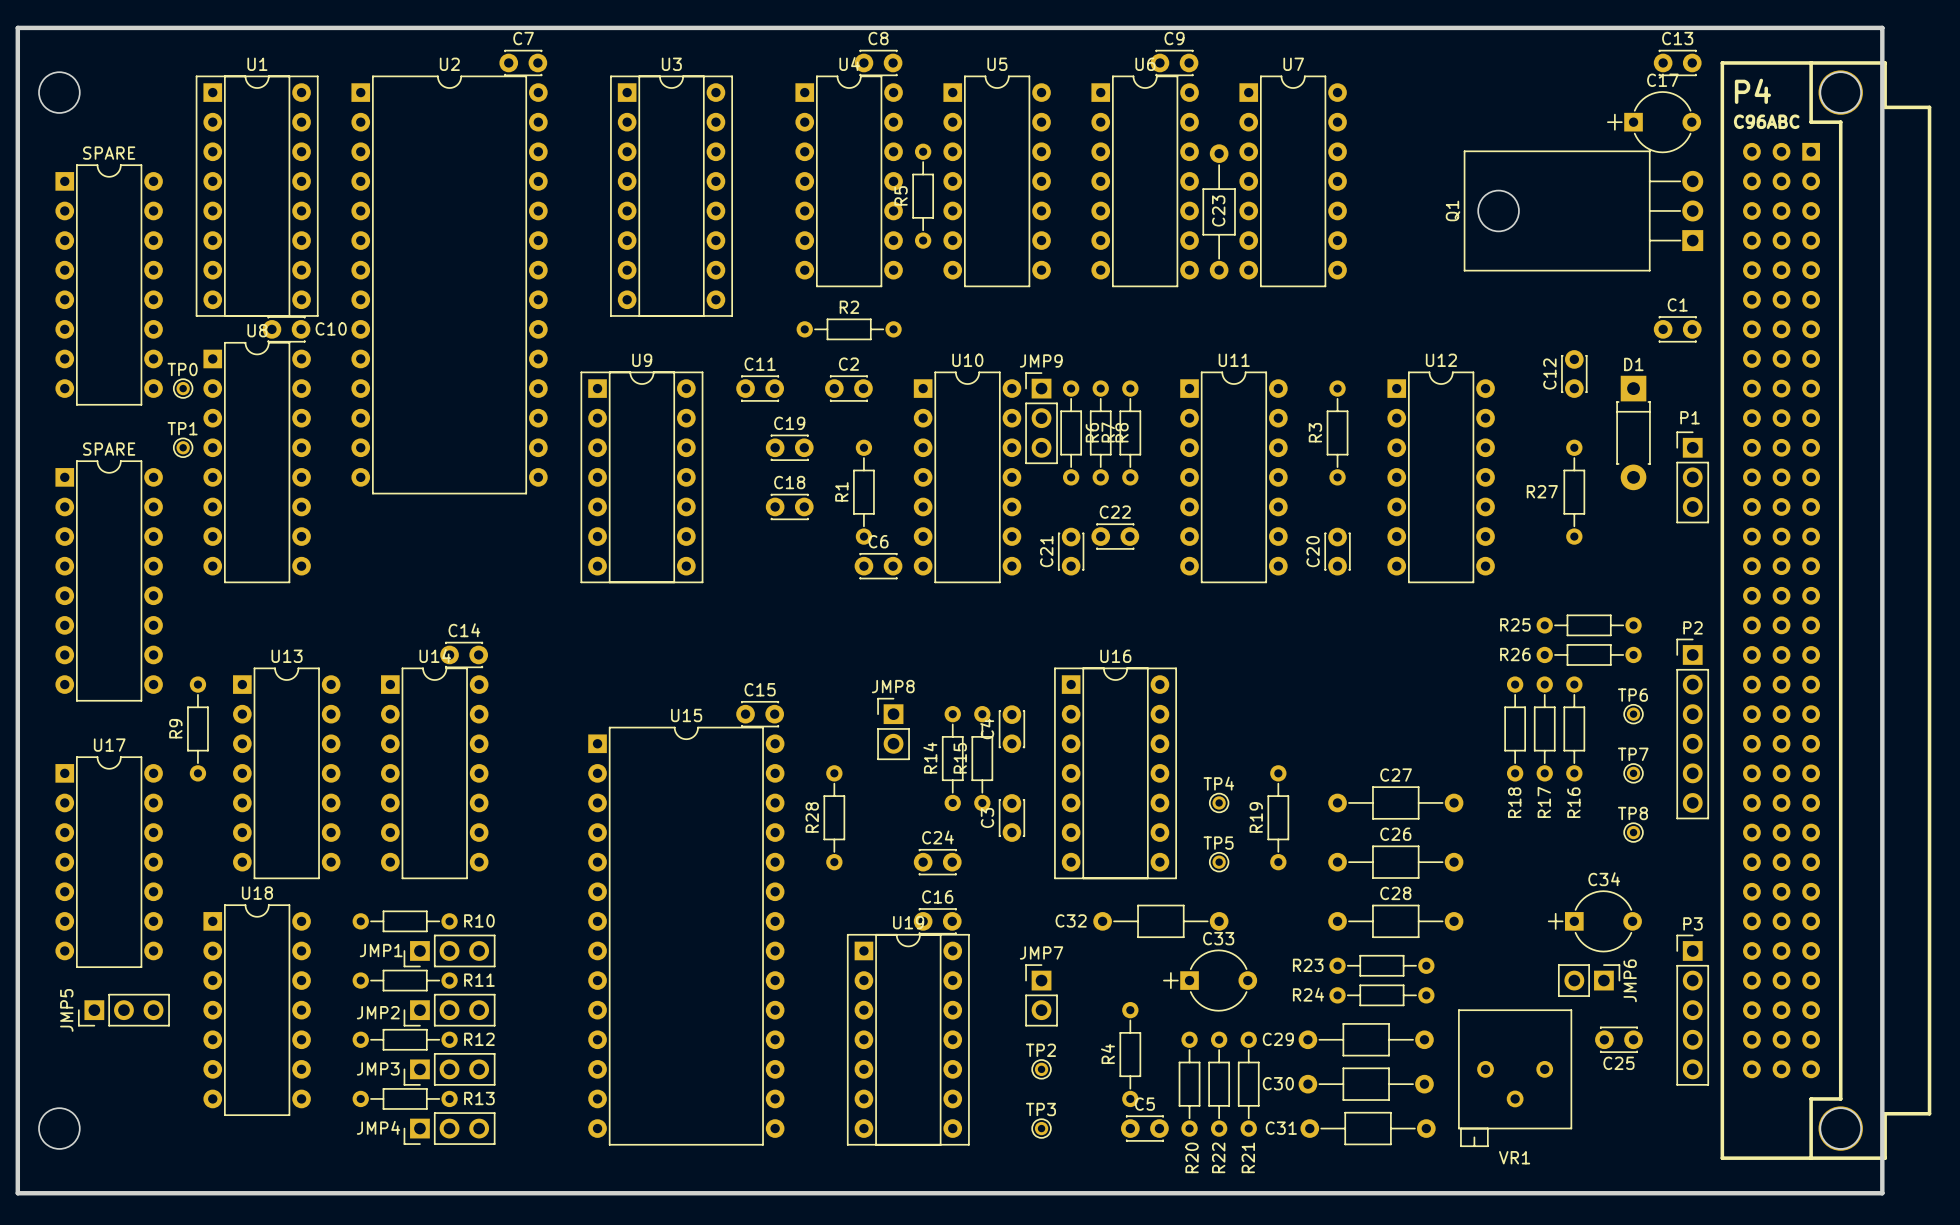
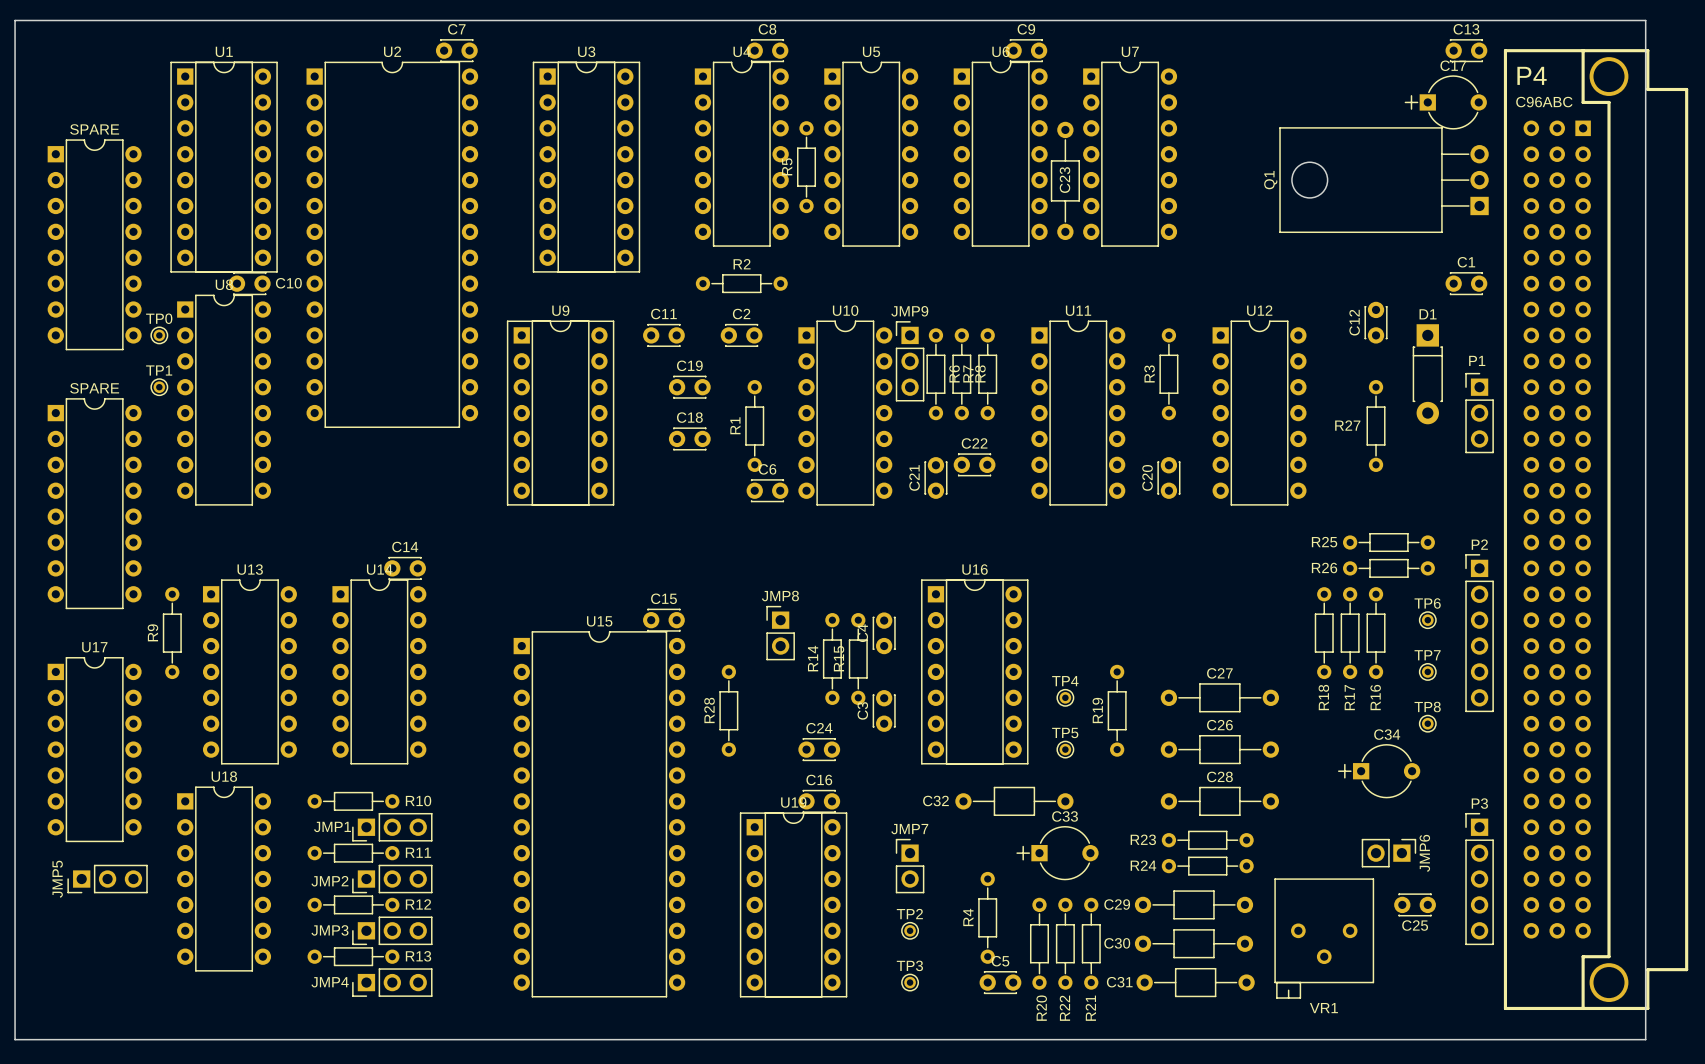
board edge: none -> (15, 20) (1645, 20) (1645, 1039) (15, 1039) (15, 20)
part: (950, 610) -> none
C34 position: (1594, 921) -> (1379, 771)

